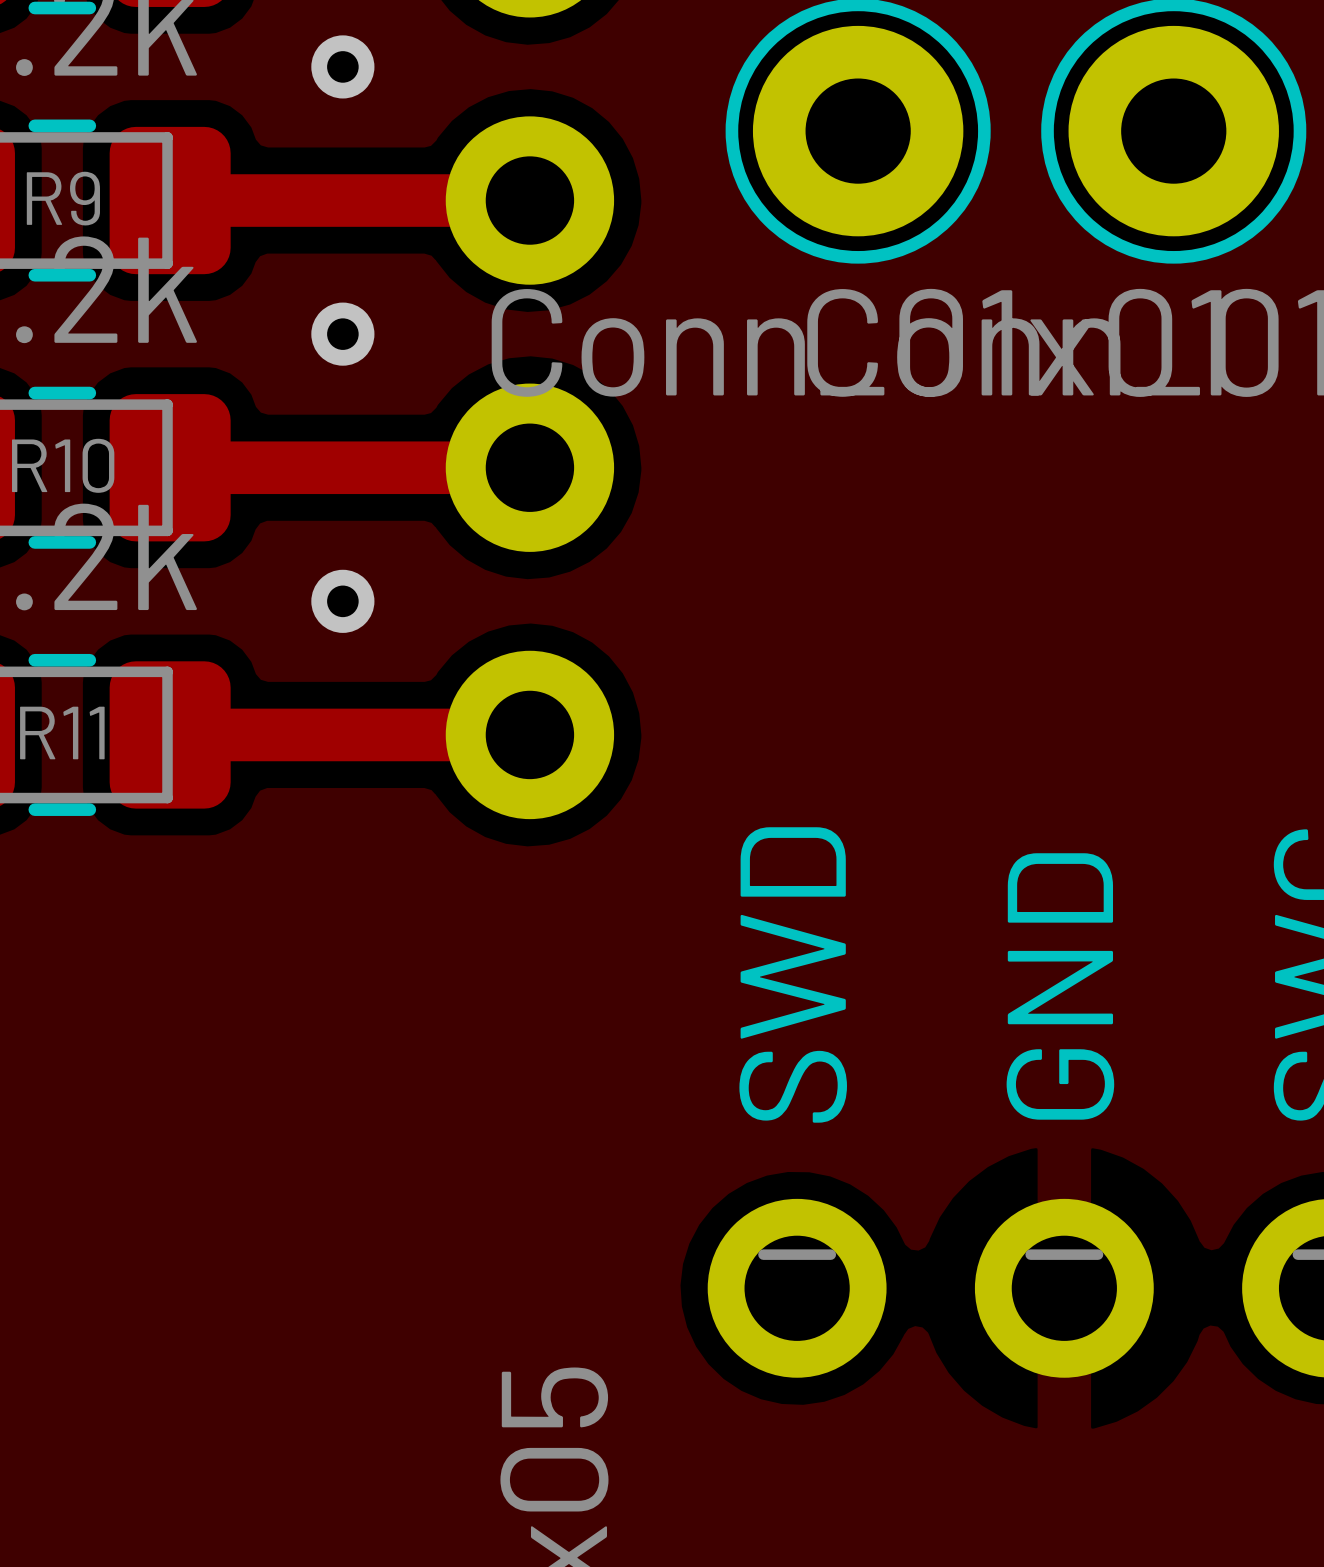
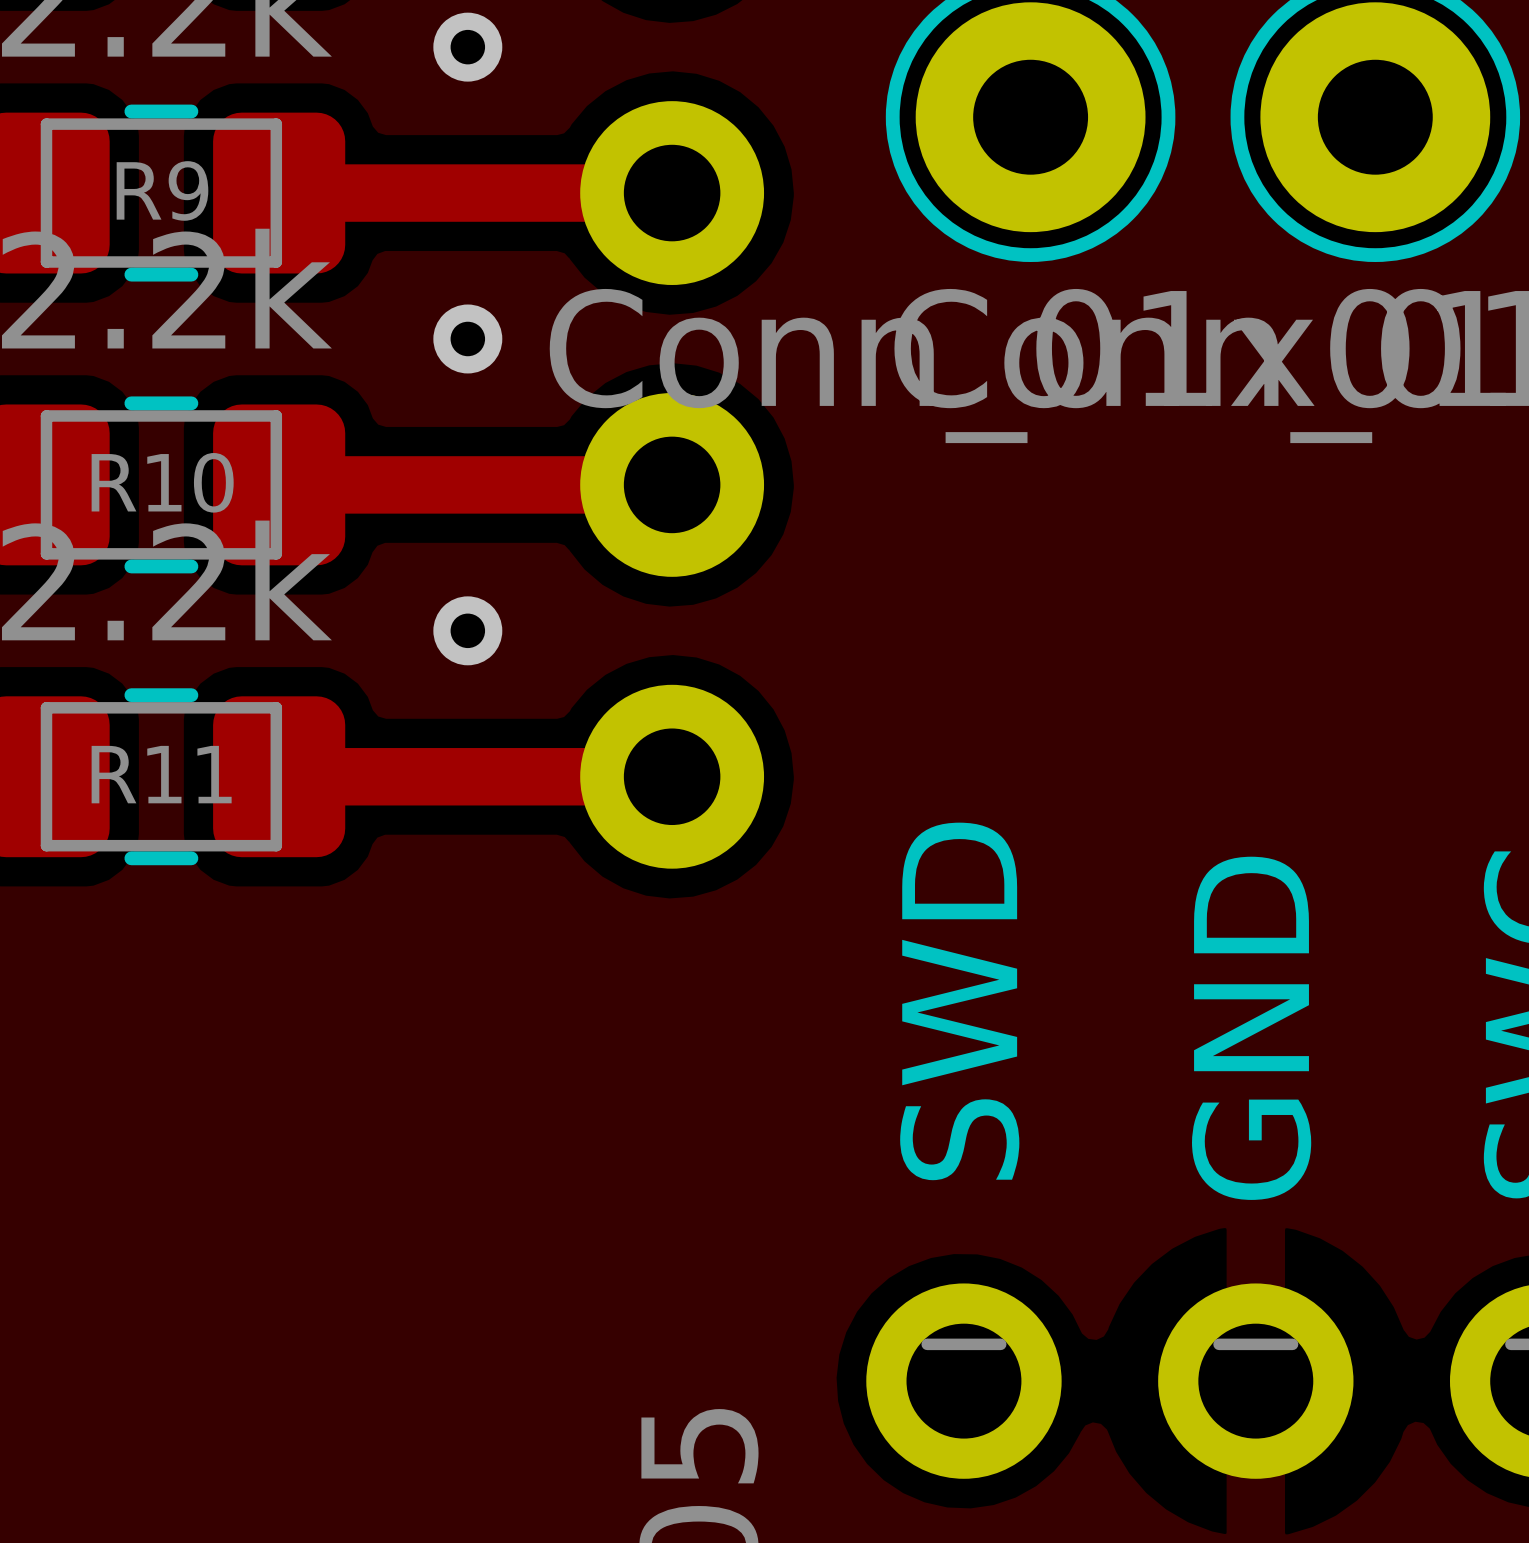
text position: SWD (793, 974) -> SWD (959, 1001)

